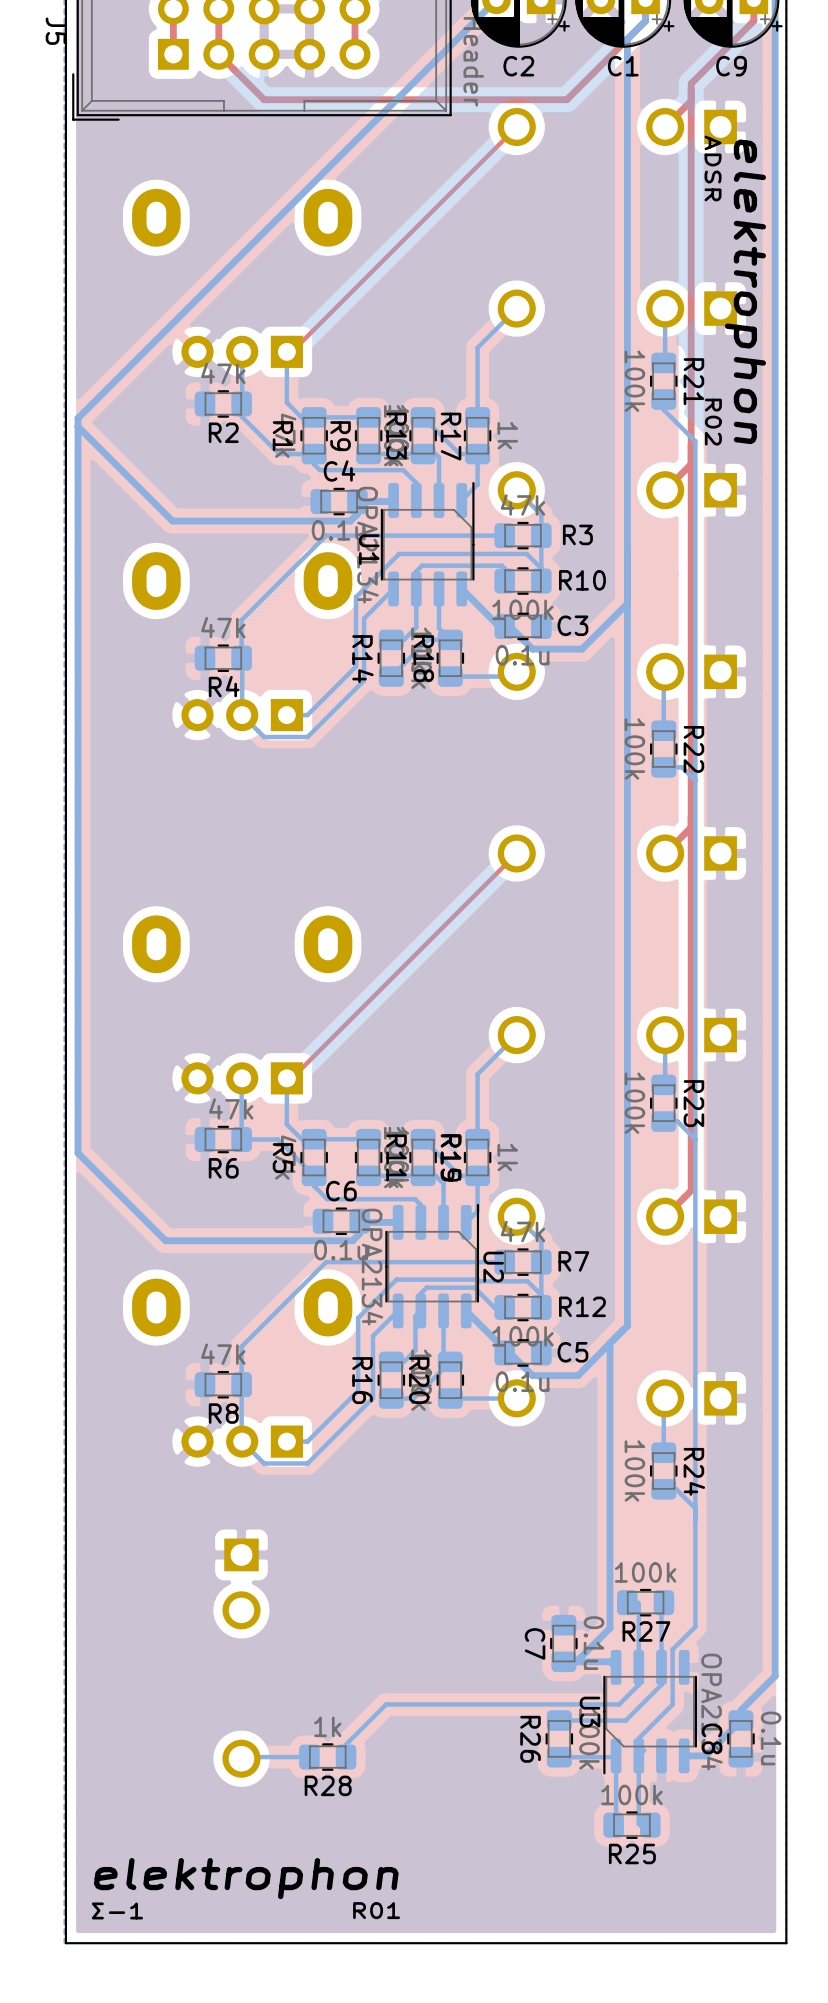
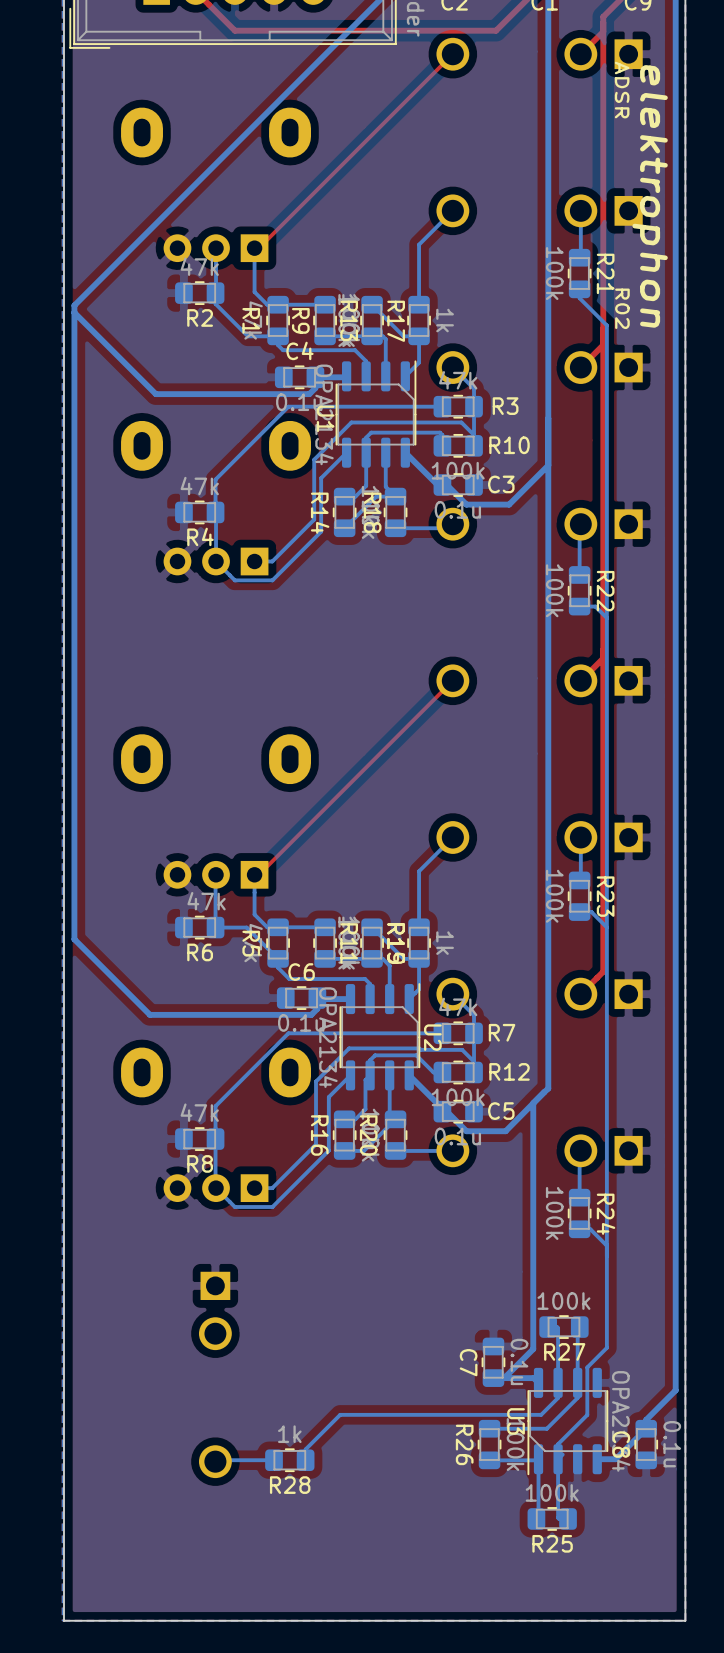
drawing: [91, 1858, 401, 1920] -> none

